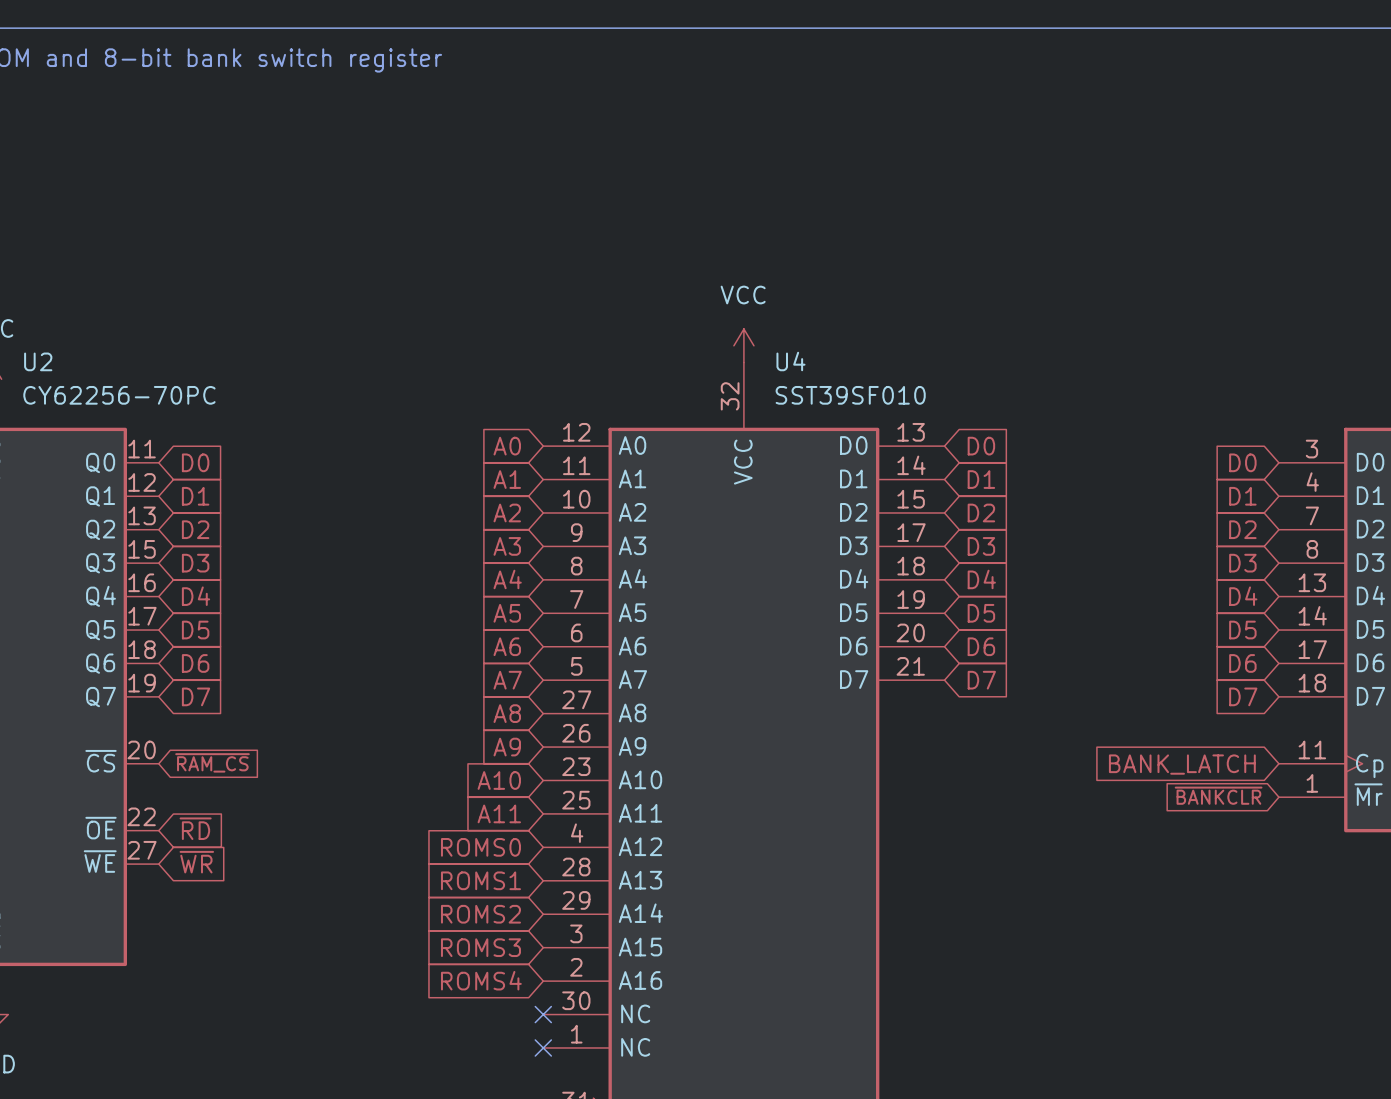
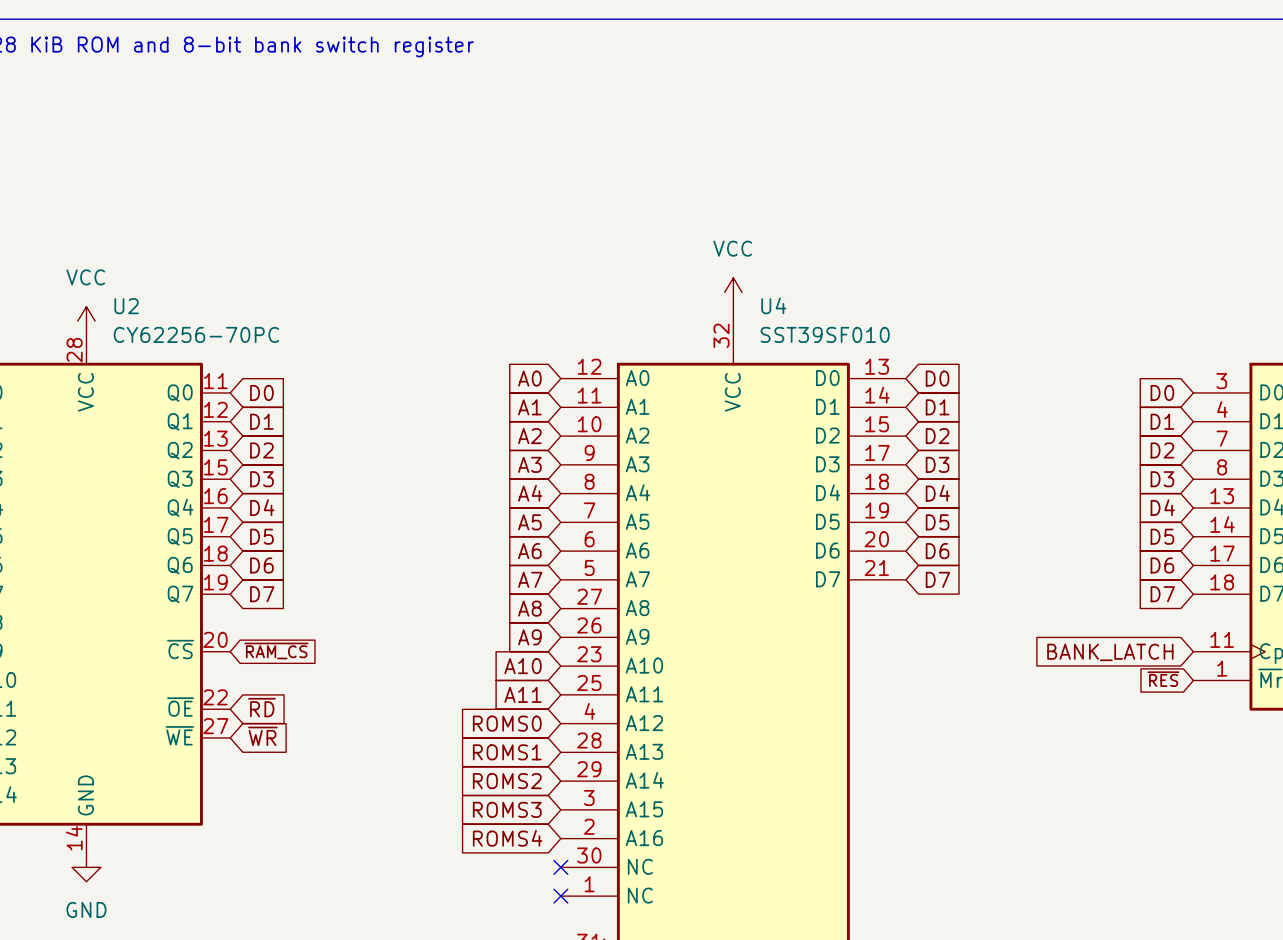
global label: ~{BANKCLR} (1218, 795) -> ~{RES} (1163, 679)

